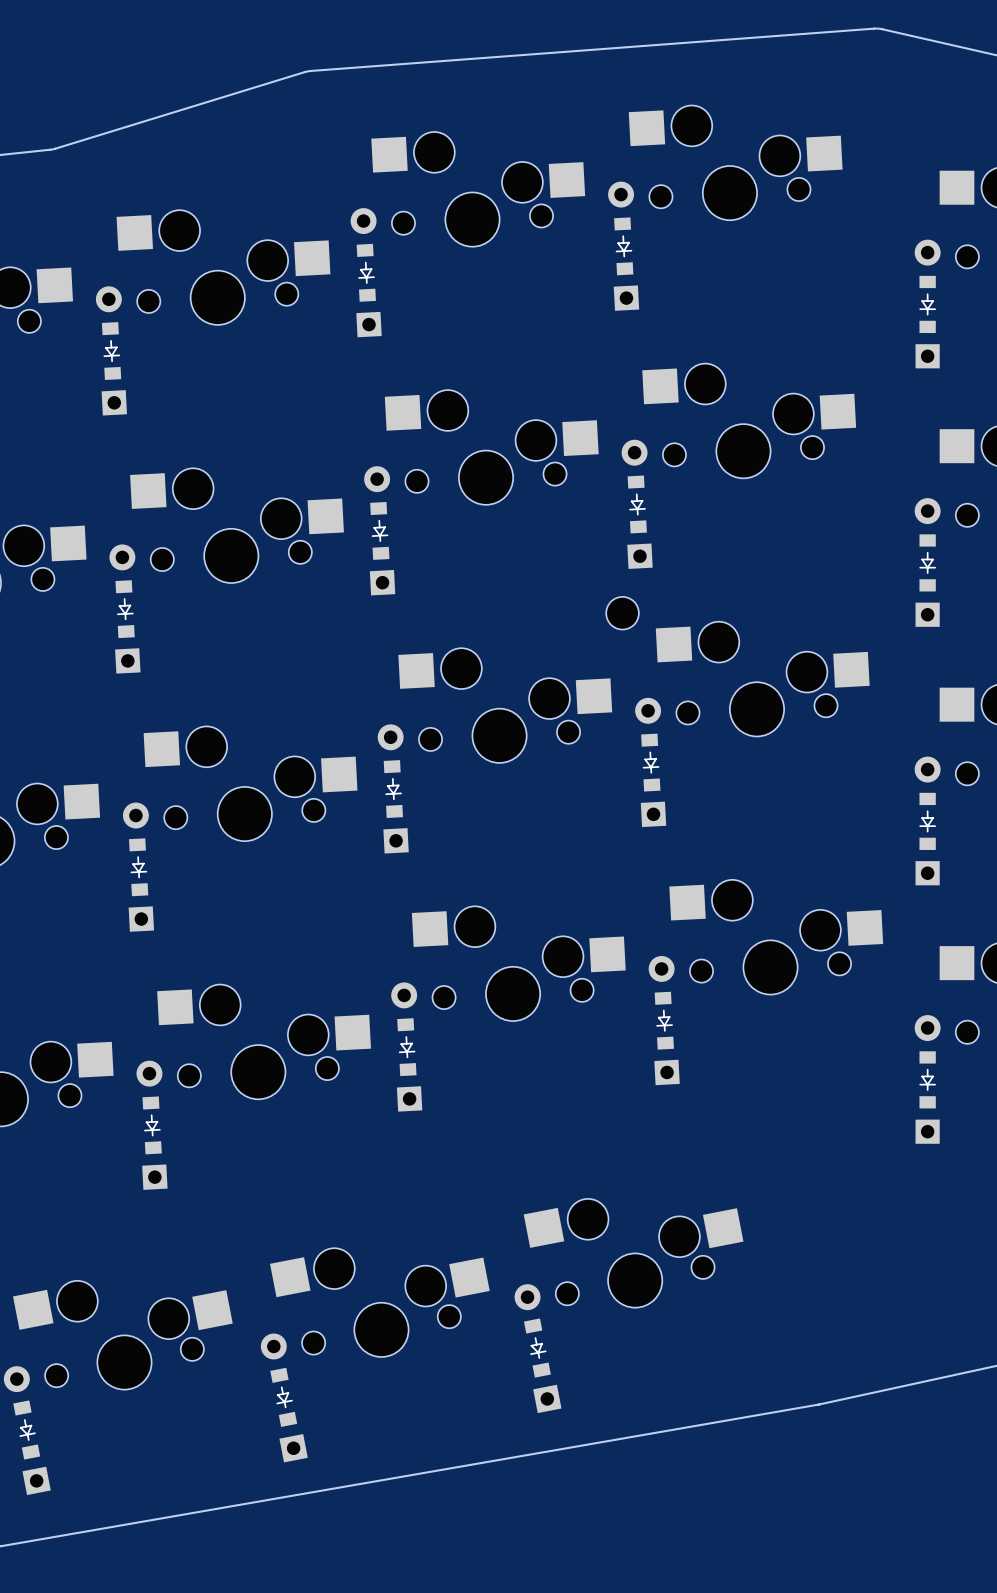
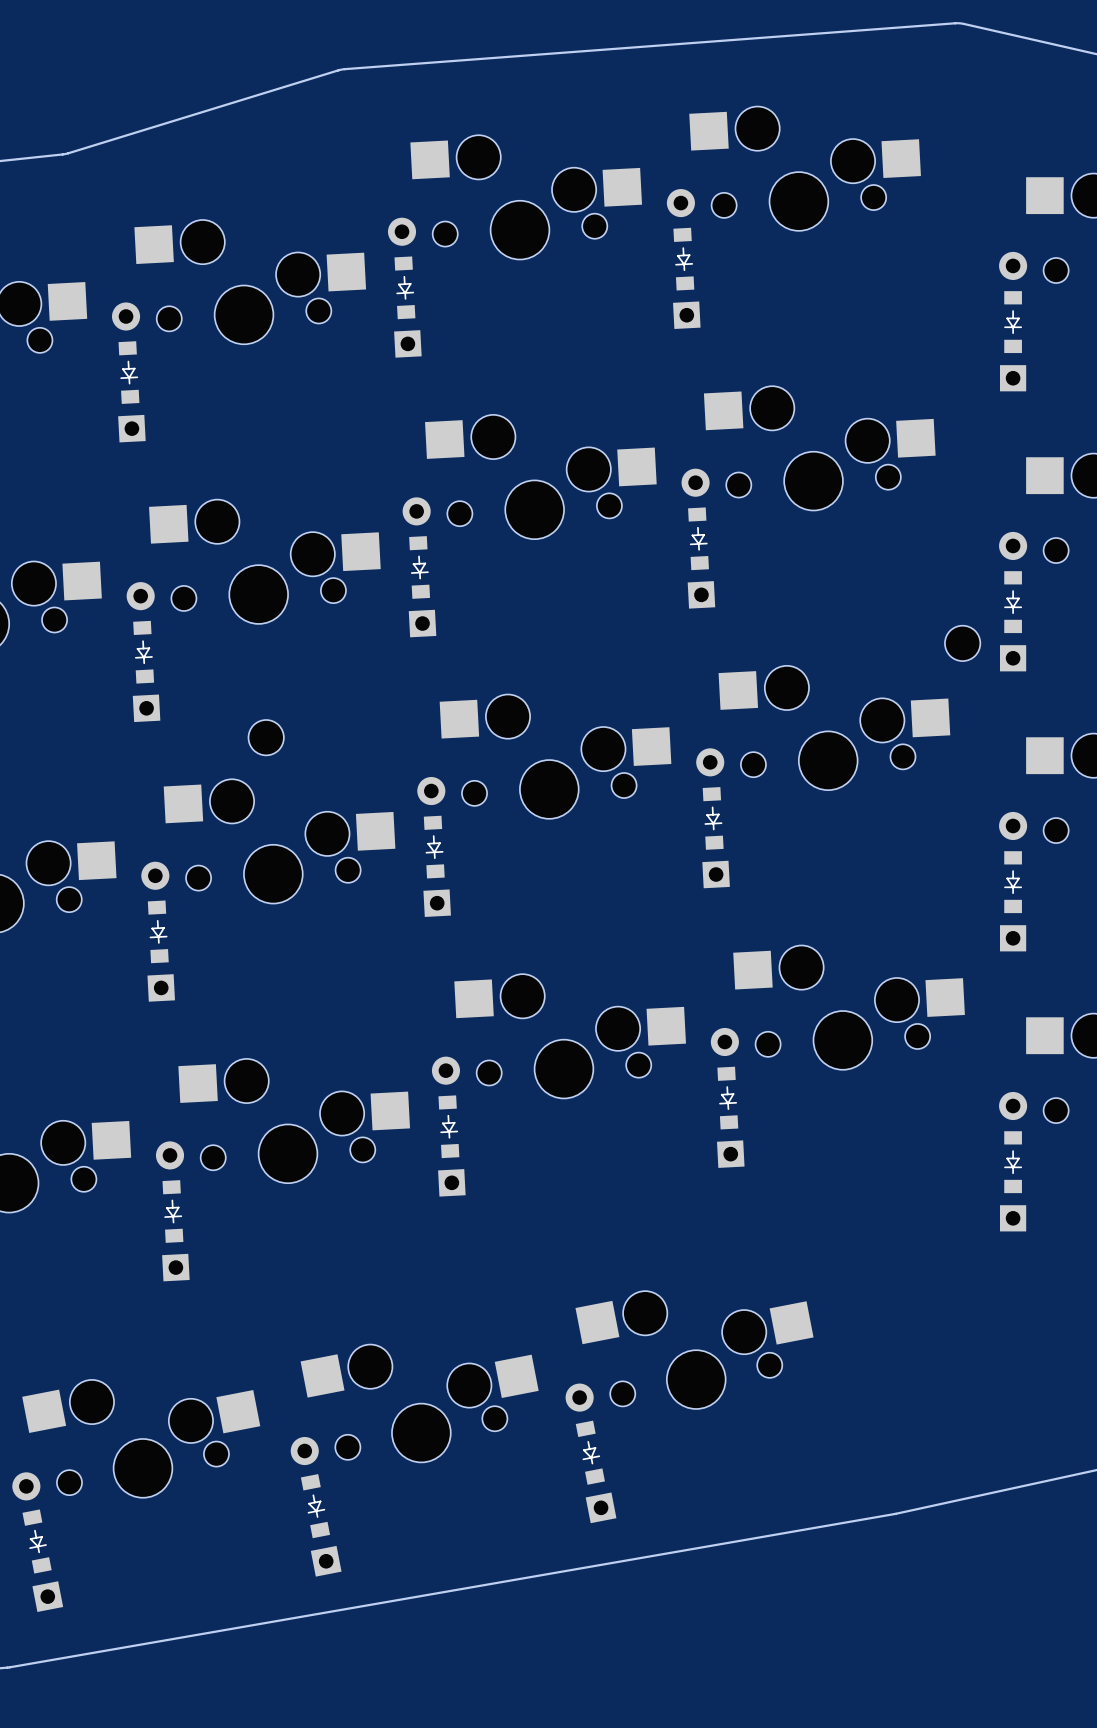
part: none -> (962, 643)
part: (622, 613) -> none
part: none -> (266, 737)

